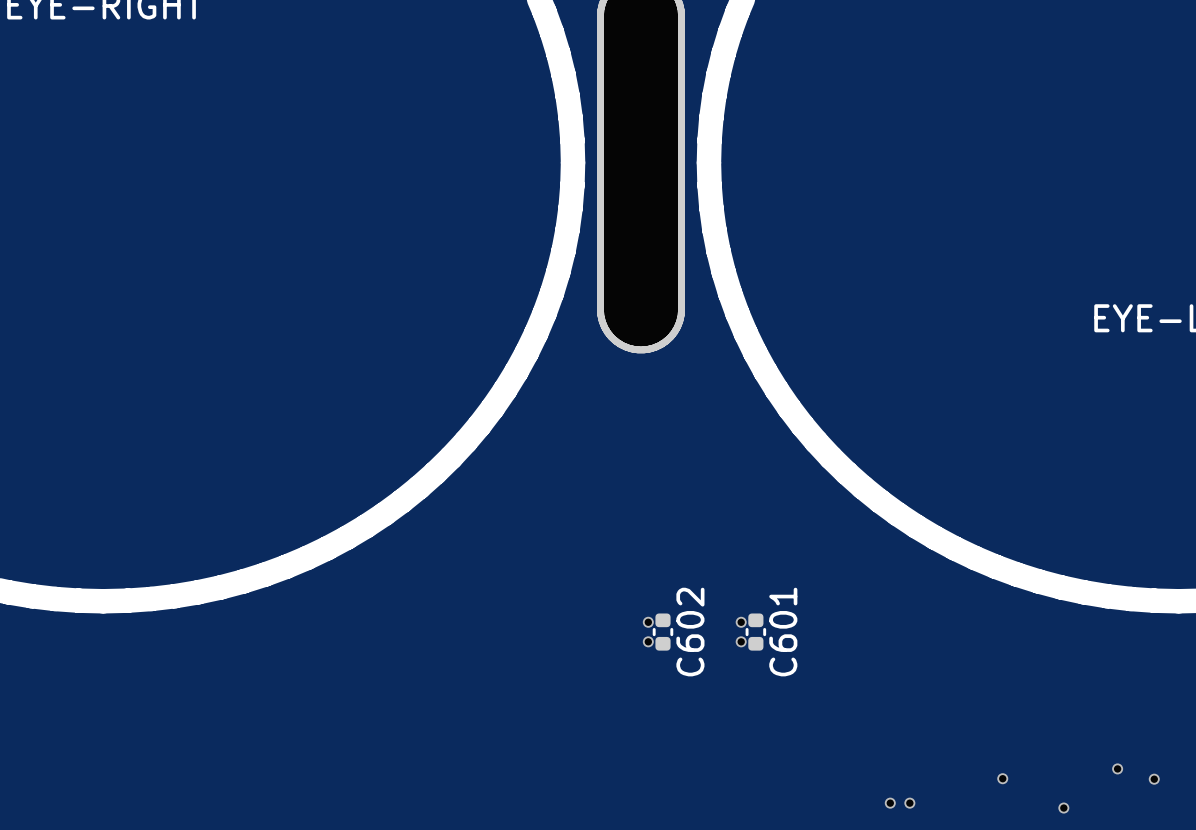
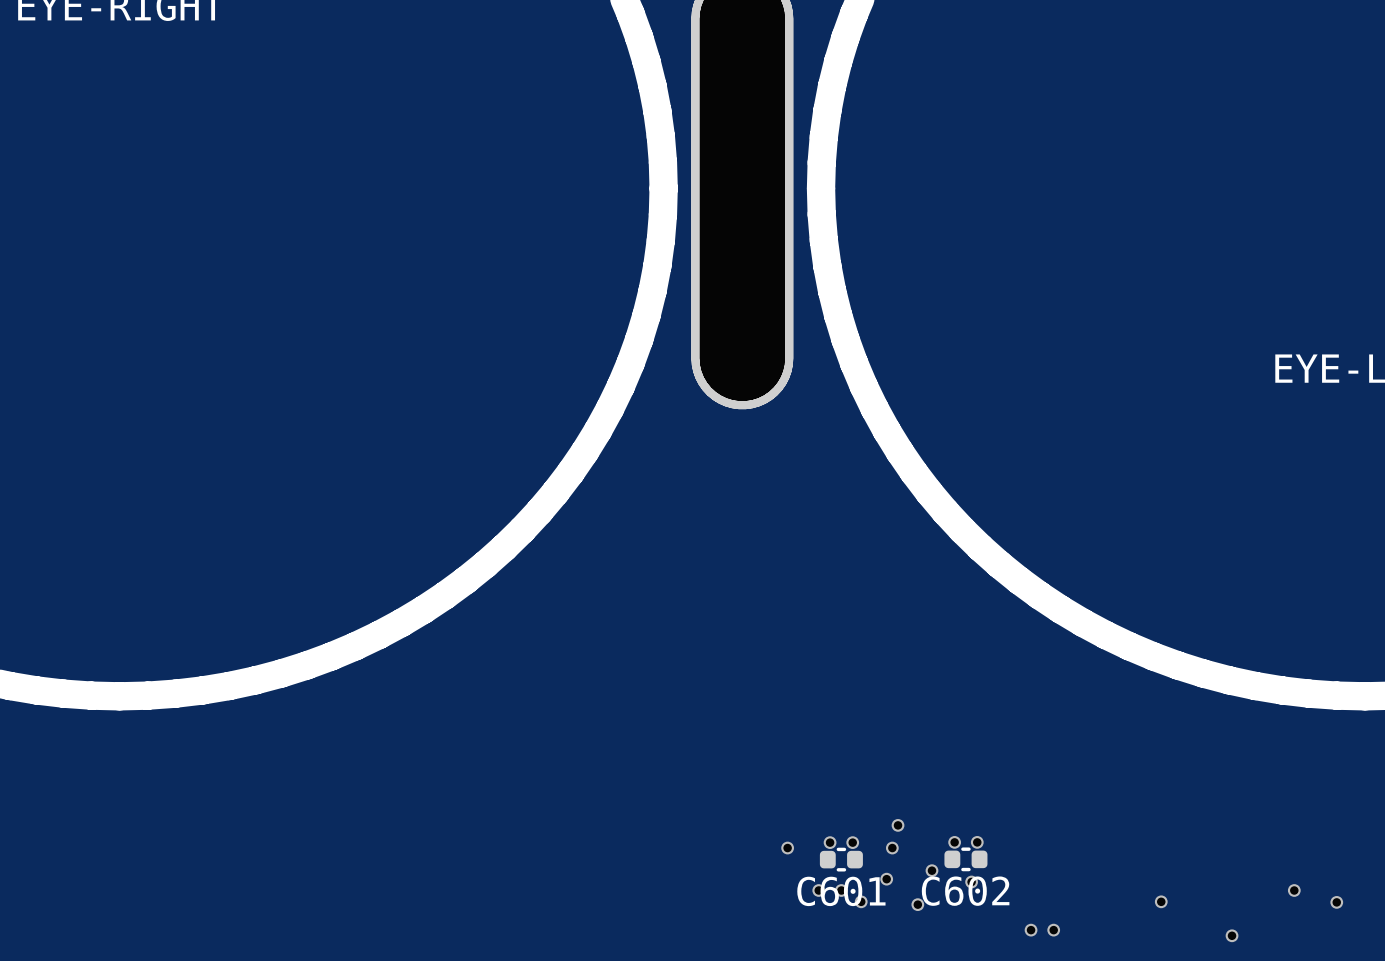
via: (648, 622) -> none
via: (741, 622) -> none
C602 rotation: 0° (662, 632) -> 90° clockwise (965, 859)
C602 position: (662, 632) -> (965, 859)
C601 rotation: 0° (755, 632) -> 90° clockwise (841, 859)
C601 position: (755, 632) -> (841, 859)
via: (648, 641) -> none
via: (741, 641) -> none
via: none -> (898, 825)
via: none -> (830, 842)
via: none -> (852, 842)
via: none -> (954, 842)
via: none -> (977, 842)
via: none -> (787, 848)
via: none -> (892, 848)
via: none -> (931, 870)
via: none -> (886, 879)
via: none -> (971, 882)
via: none -> (818, 890)
via: none -> (841, 890)
via: none -> (861, 901)
via: none -> (917, 904)

